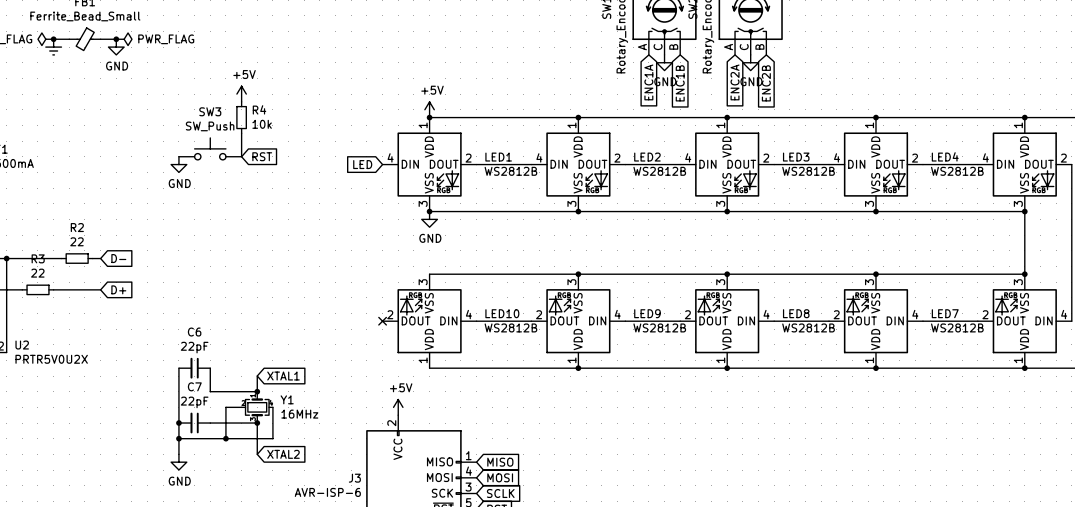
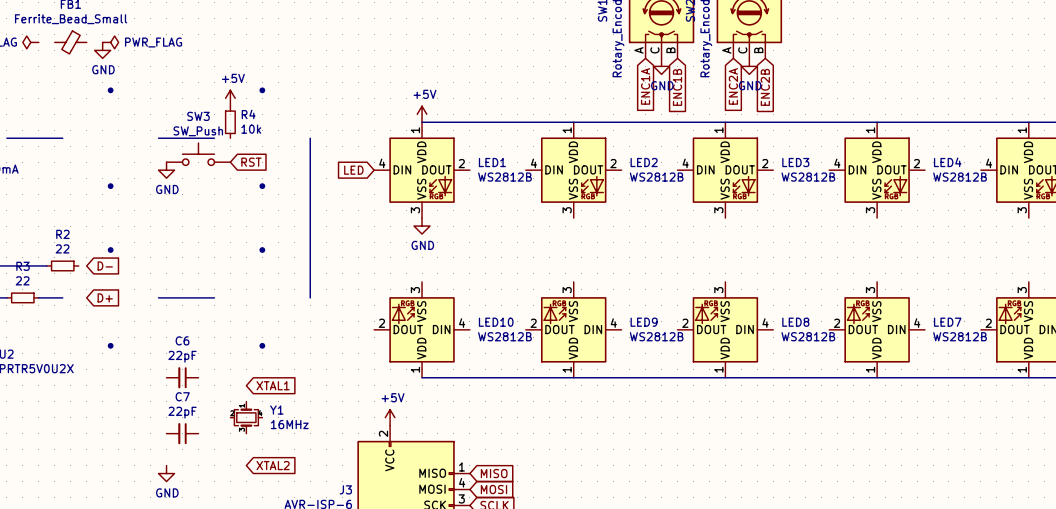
wire: (53, 39) (69, 39) -> none
junction: (53, 39) -> none
wire: (100, 39) (116, 39) -> none
junction: (116, 39) -> none
power symbol: (53, 47) -> none
junction: none -> (110, 90)
junction: none -> (262, 90)
junction: (429, 117) -> none
junction: (578, 117) -> none
junction: (727, 117) -> none
junction: (875, 117) -> none
junction: (1024, 117) -> none
wire: none -> (6, 138) (62, 138)
wire: none -> (158, 138) (214, 138)
wire: (241, 133) (241, 156) -> none
wire: none -> (310, 138) (310, 297)
wire: (476, 164) (531, 164) -> none
wire: (625, 164) (680, 164) -> none
wire: (774, 164) (829, 164) -> none
wire: (922, 164) (977, 164) -> none
junction: none -> (110, 186)
junction: none -> (262, 186)
wire: (429, 211) (1024, 211) (1024, 274) (429, 274) -> none
junction: (429, 211) -> none
junction: (578, 211) -> none
junction: (727, 211) -> none
junction: (875, 211) -> none
junction: (1024, 211) -> none
junction: none -> (110, 250)
junction: none -> (262, 250)
wire: (92, 258) (100, 258) -> none
junction: (578, 274) -> none
junction: (727, 274) -> none
junction: (875, 274) -> none
junction: (1024, 274) -> none
wire: (77, 289) (100, 289) -> none
wire: none -> (158, 297) (214, 297)
no-connect mark: (382, 321) -> none
wire: (476, 321) (531, 321) -> none
wire: (625, 321) (680, 321) -> none
wire: (774, 321) (829, 321) -> none
wire: (922, 321) (977, 321) -> none
junction: none -> (110, 345)
junction: none -> (262, 345)
wire: (178, 368) (178, 454) -> none
wire: (210, 368) (210, 391) (257, 391) (257, 376) -> none
junction: (578, 368) -> none
junction: (727, 368) -> none
junction: (875, 368) -> none
junction: (1024, 368) -> none
junction: (257, 391) -> none
wire: (241, 407) (225, 407) (225, 438) -> none
wire: (272, 407) (272, 438) (178, 438) -> none
junction: (178, 423) -> none
wire: (210, 423) (257, 423) (257, 454) -> none
junction: (257, 423) -> none
junction: (178, 438) -> none
junction: (225, 438) -> none

